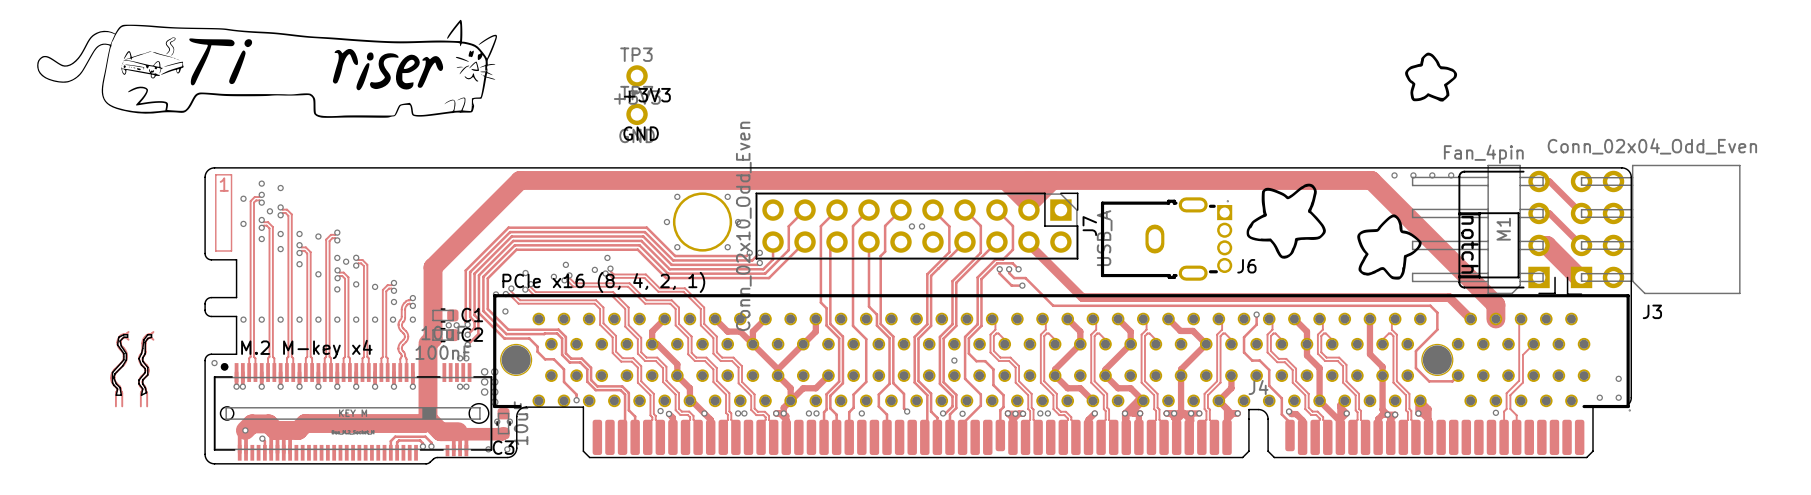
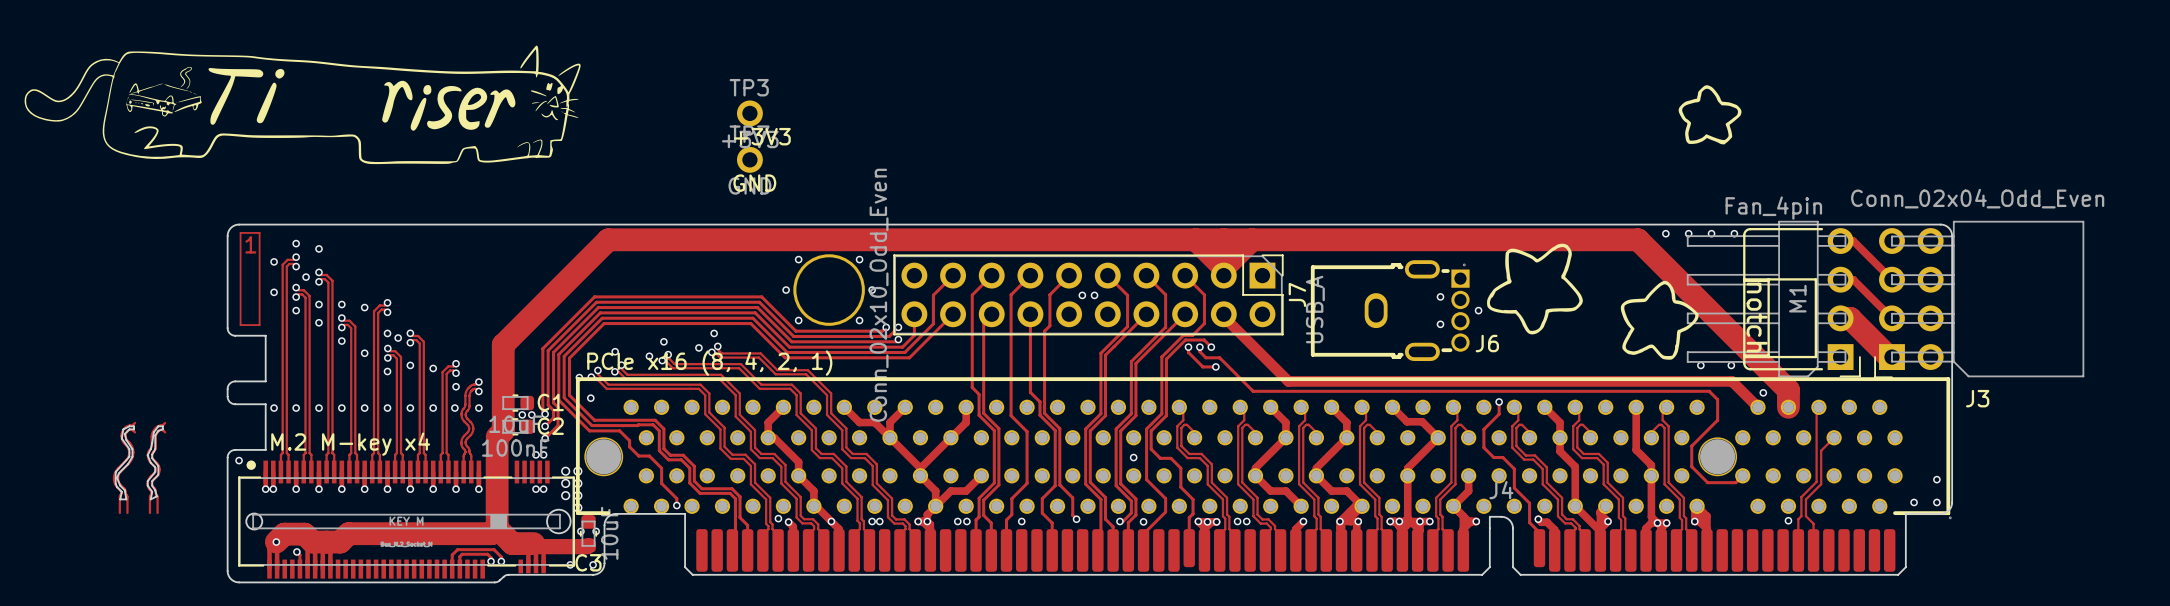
via: none -> (1440, 296)
via: none -> (1478, 310)
via: none -> (1440, 324)
via: none -> (1700, 365)
via: none -> (1731, 365)
via: none -> (1763, 392)

